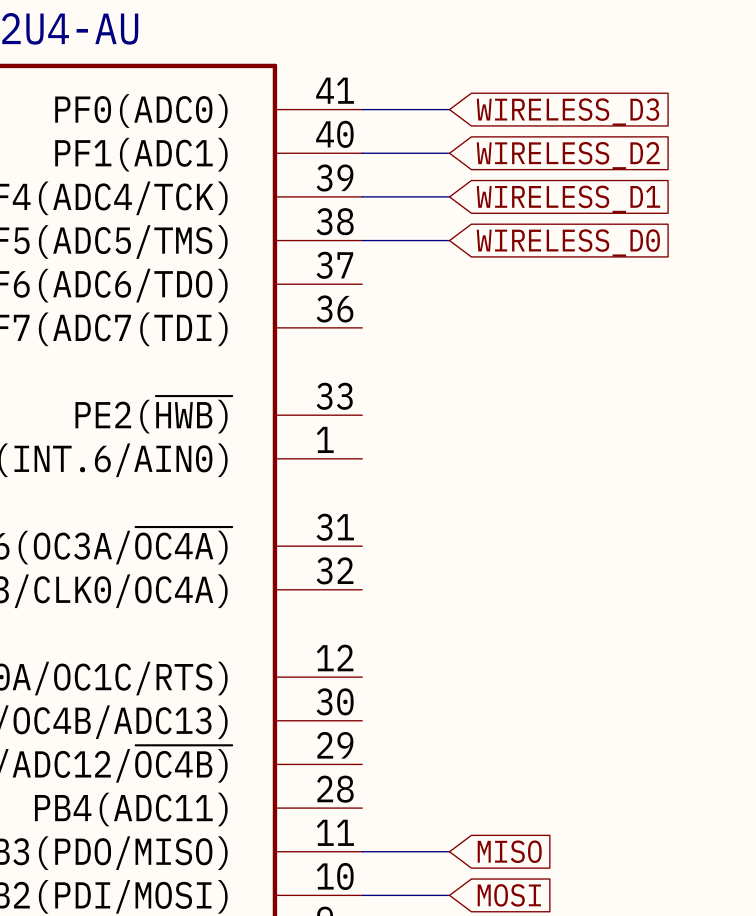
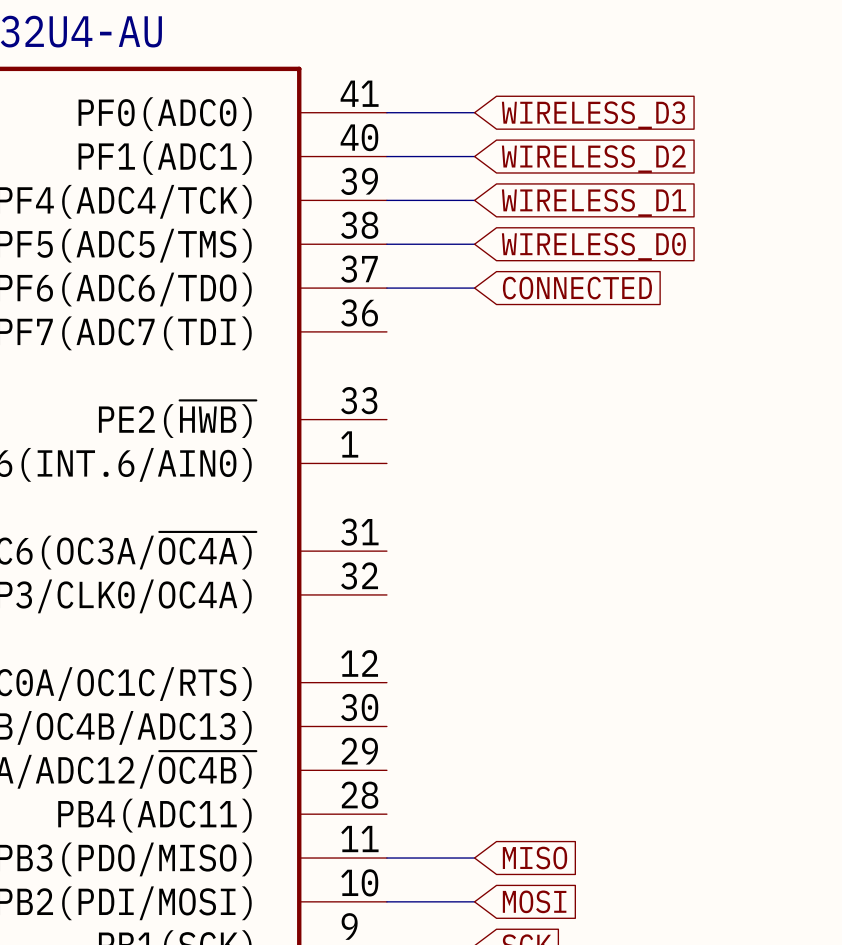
wire: none -> (386, 288) (474, 288)
global label: none -> CONNECTED (577, 288)

